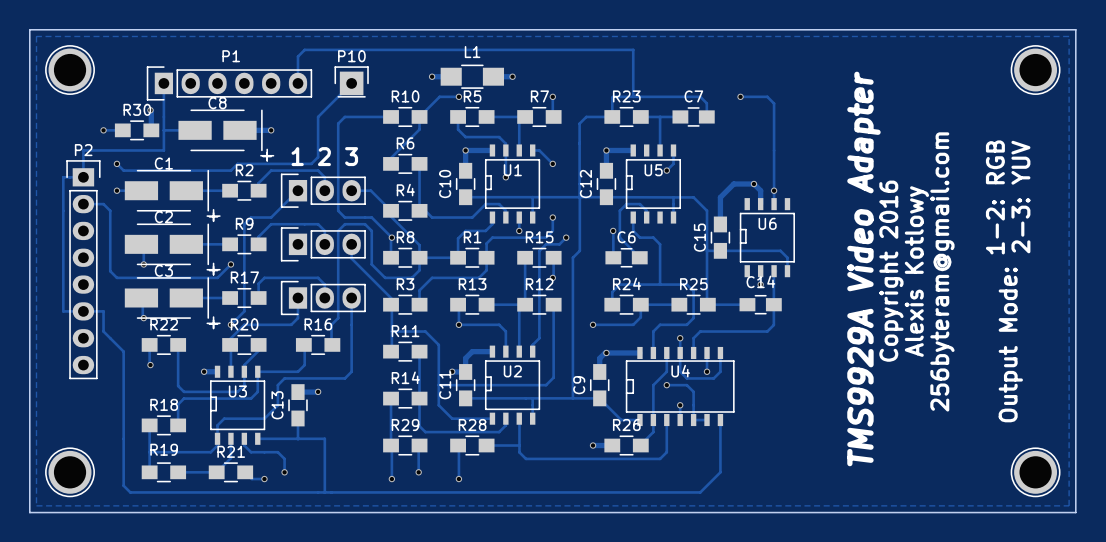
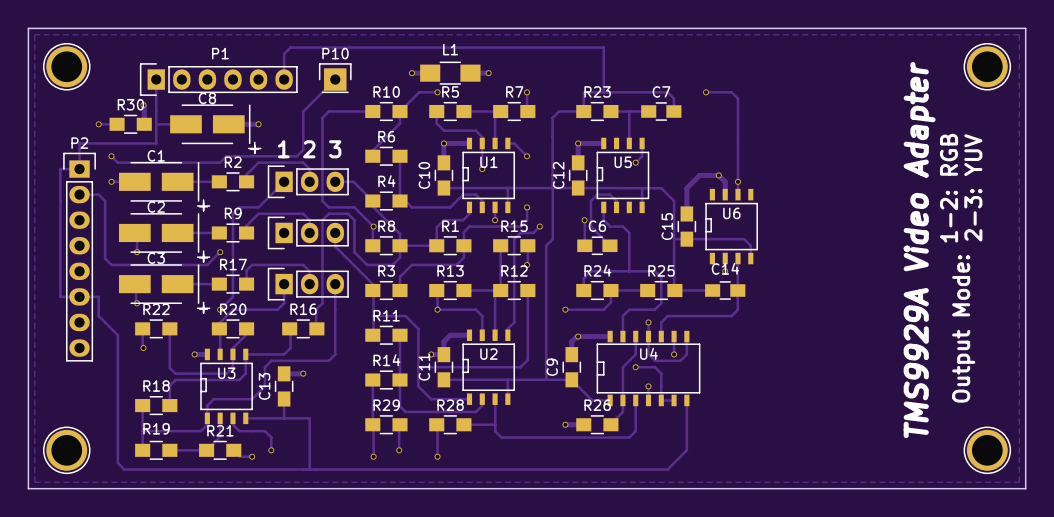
text position: TMS9929A Video Adapter (863, 268) -> TMS9929A Video Adapter (919, 250)
text: Copyright 2016 (891, 271) -> none
text: Alexis Kotlowy (916, 271) -> none
text: 256byteram@gmail.com (942, 271) -> none

